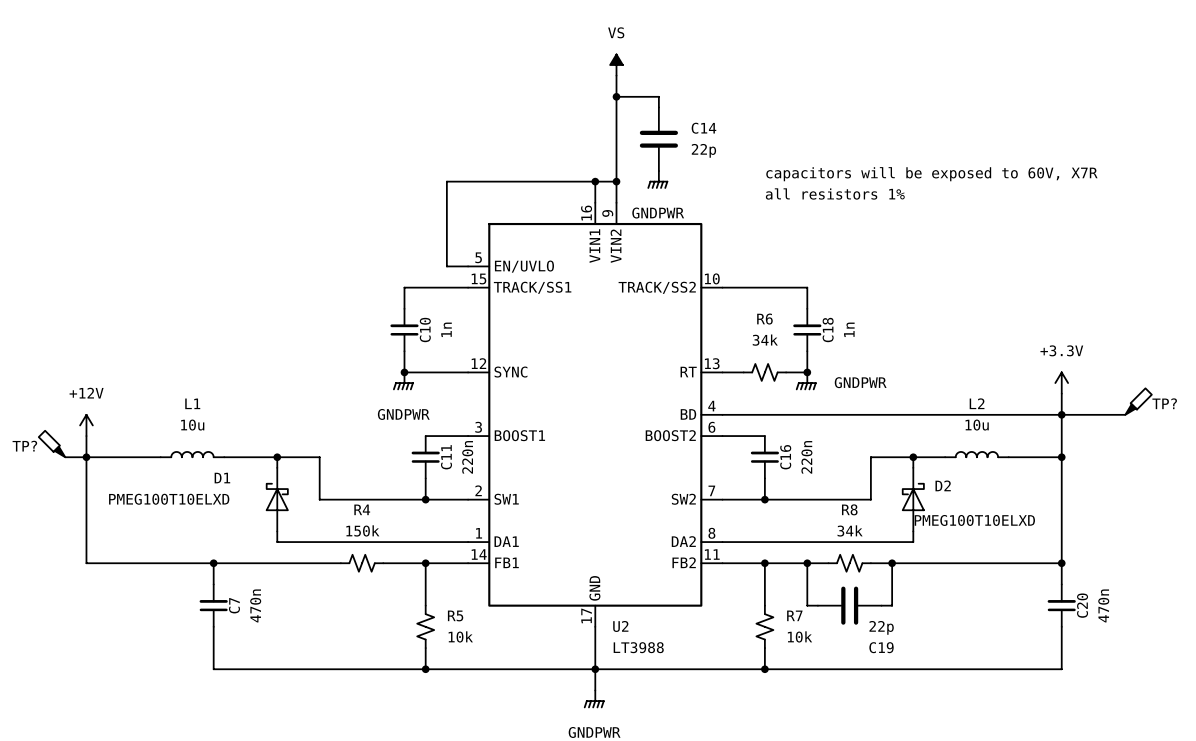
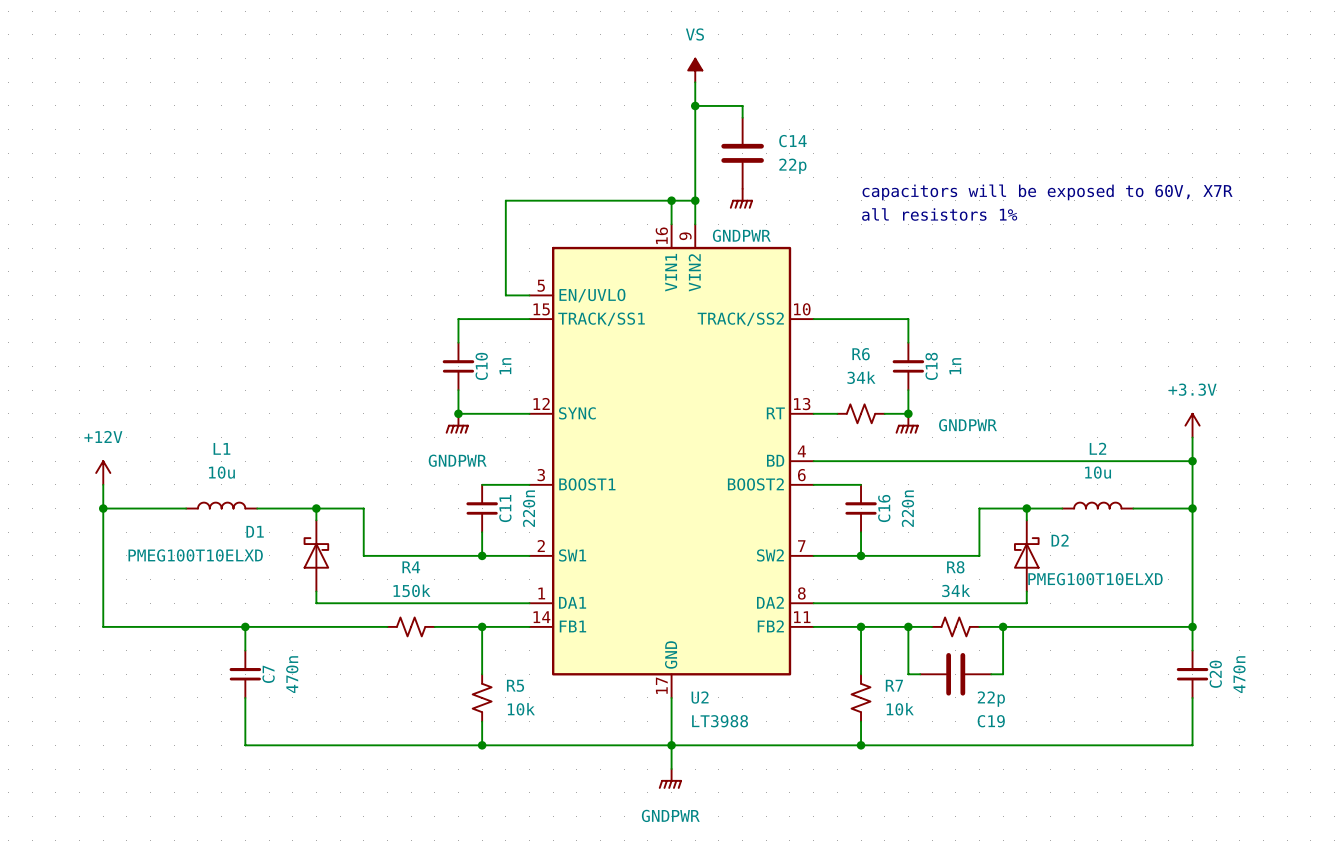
TP?: (1138, 401) -> none
wire: (1061, 414) (1125, 414) -> none
TP?: (52, 443) -> none
wire: (65, 457) (86, 457) -> none

